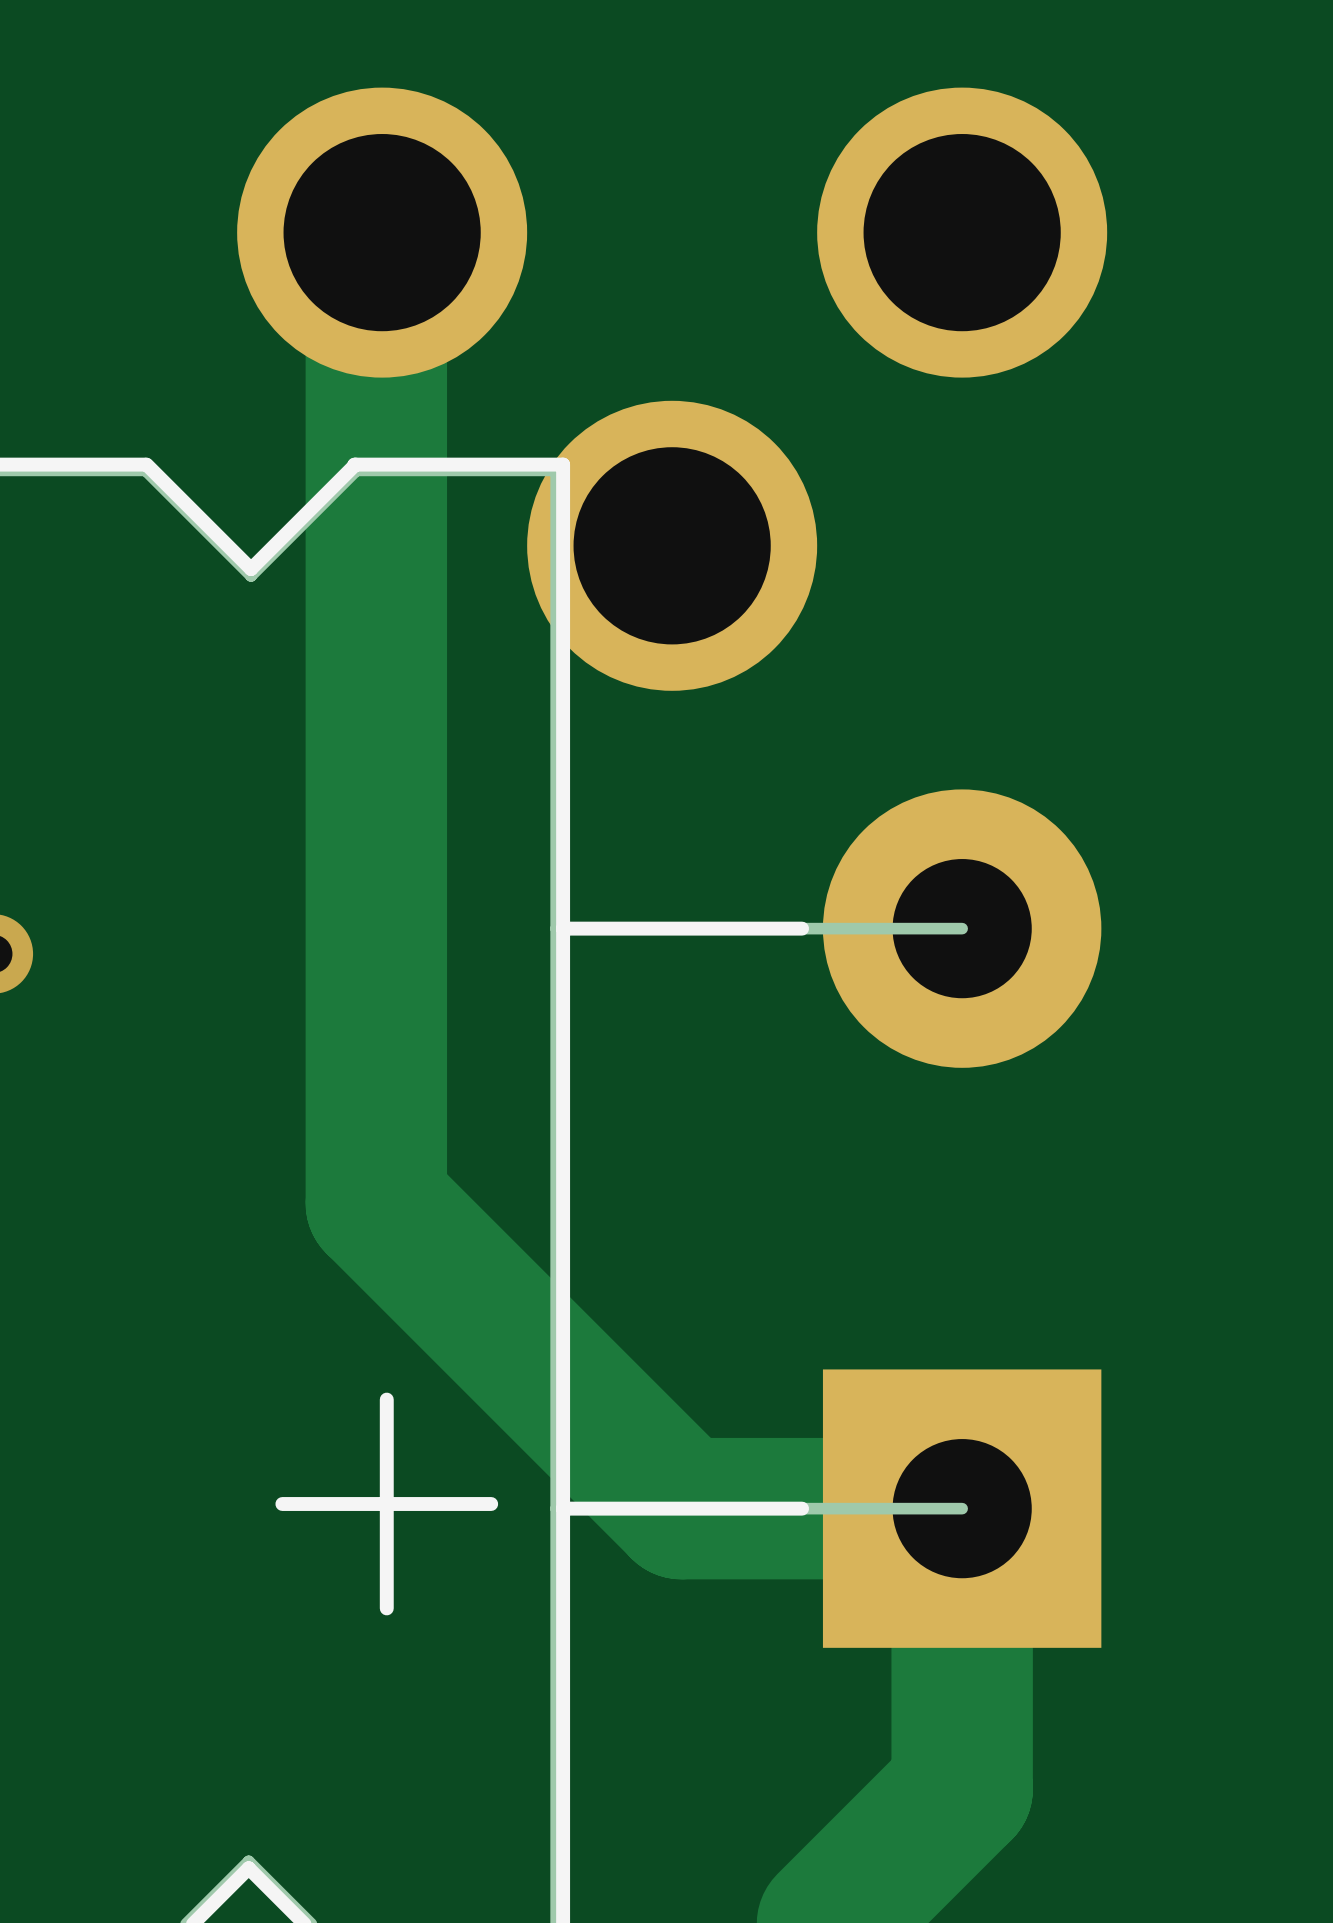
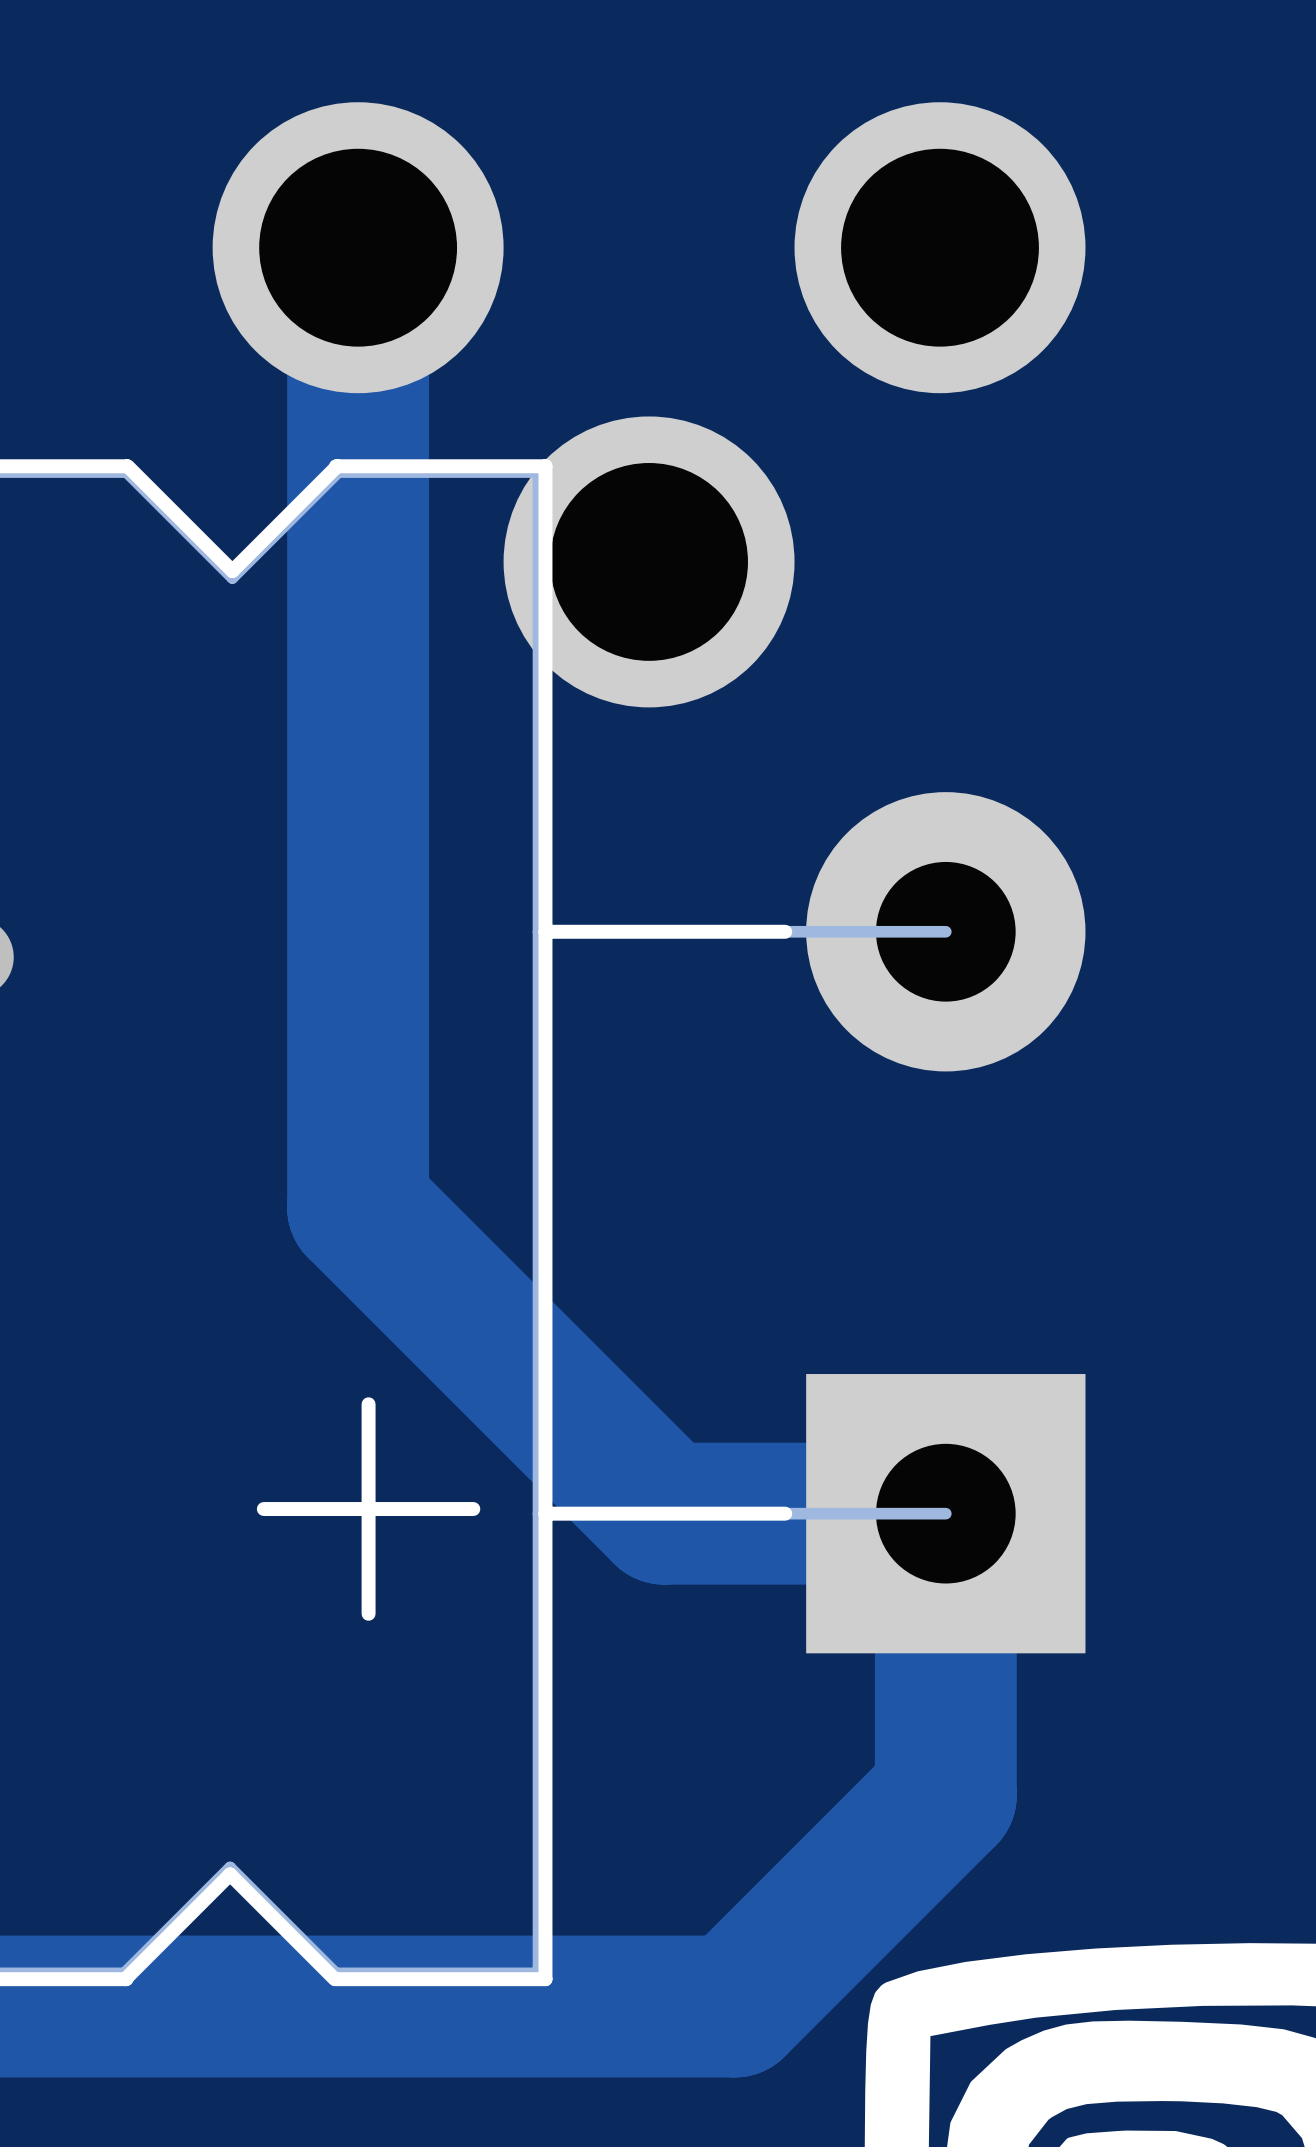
part position: (672, 389) -> (649, 404)

